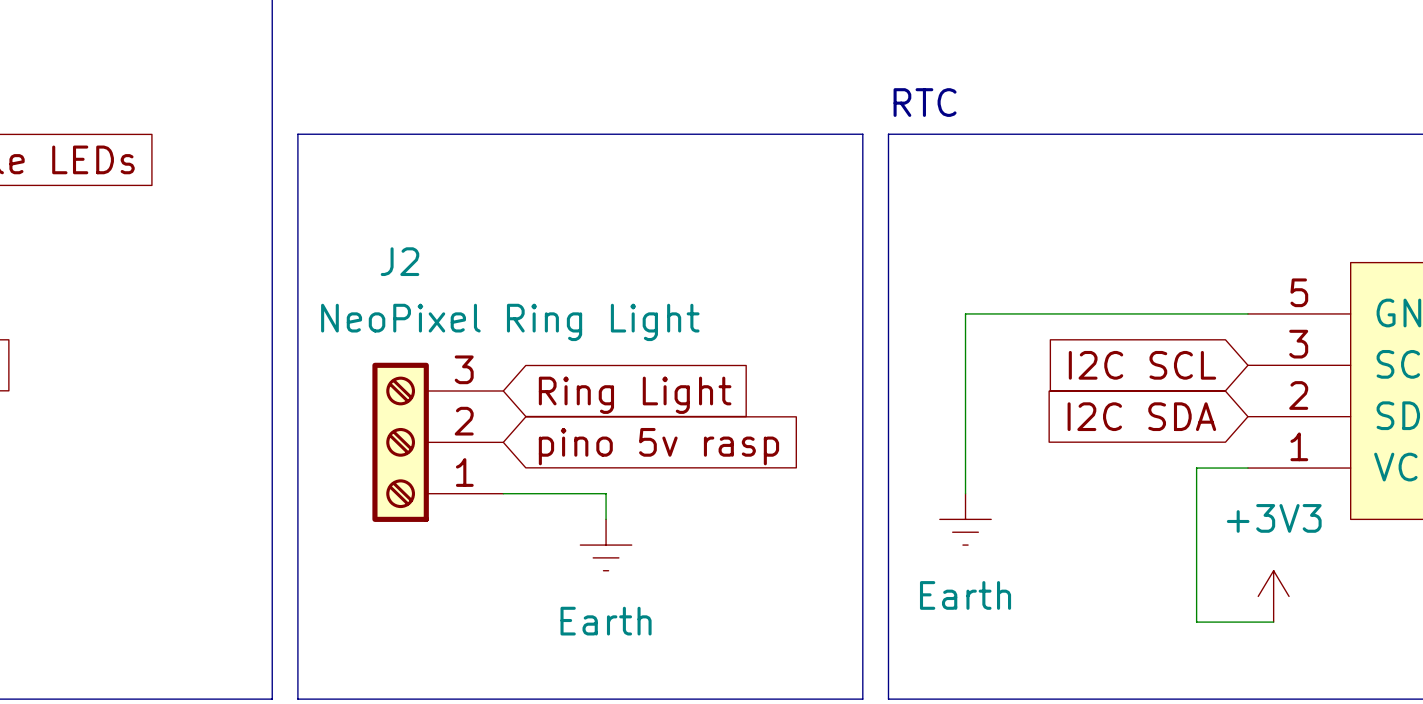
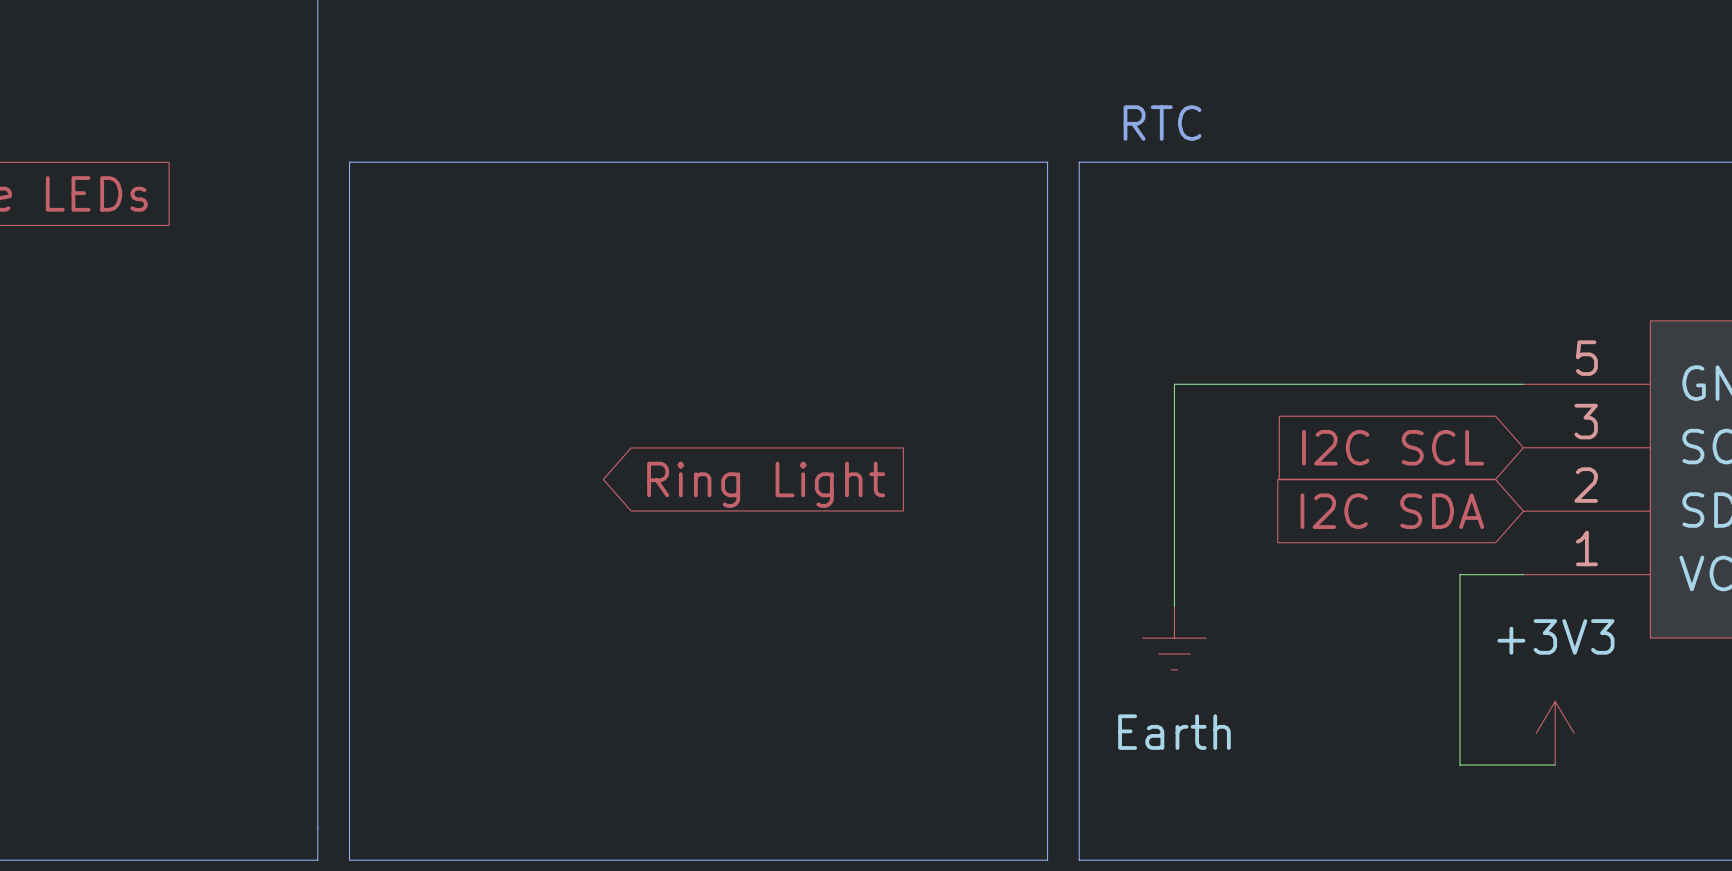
text position: RTC (925, 102) -> RTC (1162, 123)
J2: NeoPixel Ring Light (437, 442) -> none
global label: pino 5v rasp (658, 446) -> none
wire: (503, 493) (606, 493) (606, 519) -> none
power symbol: Earth (606, 545) -> none

